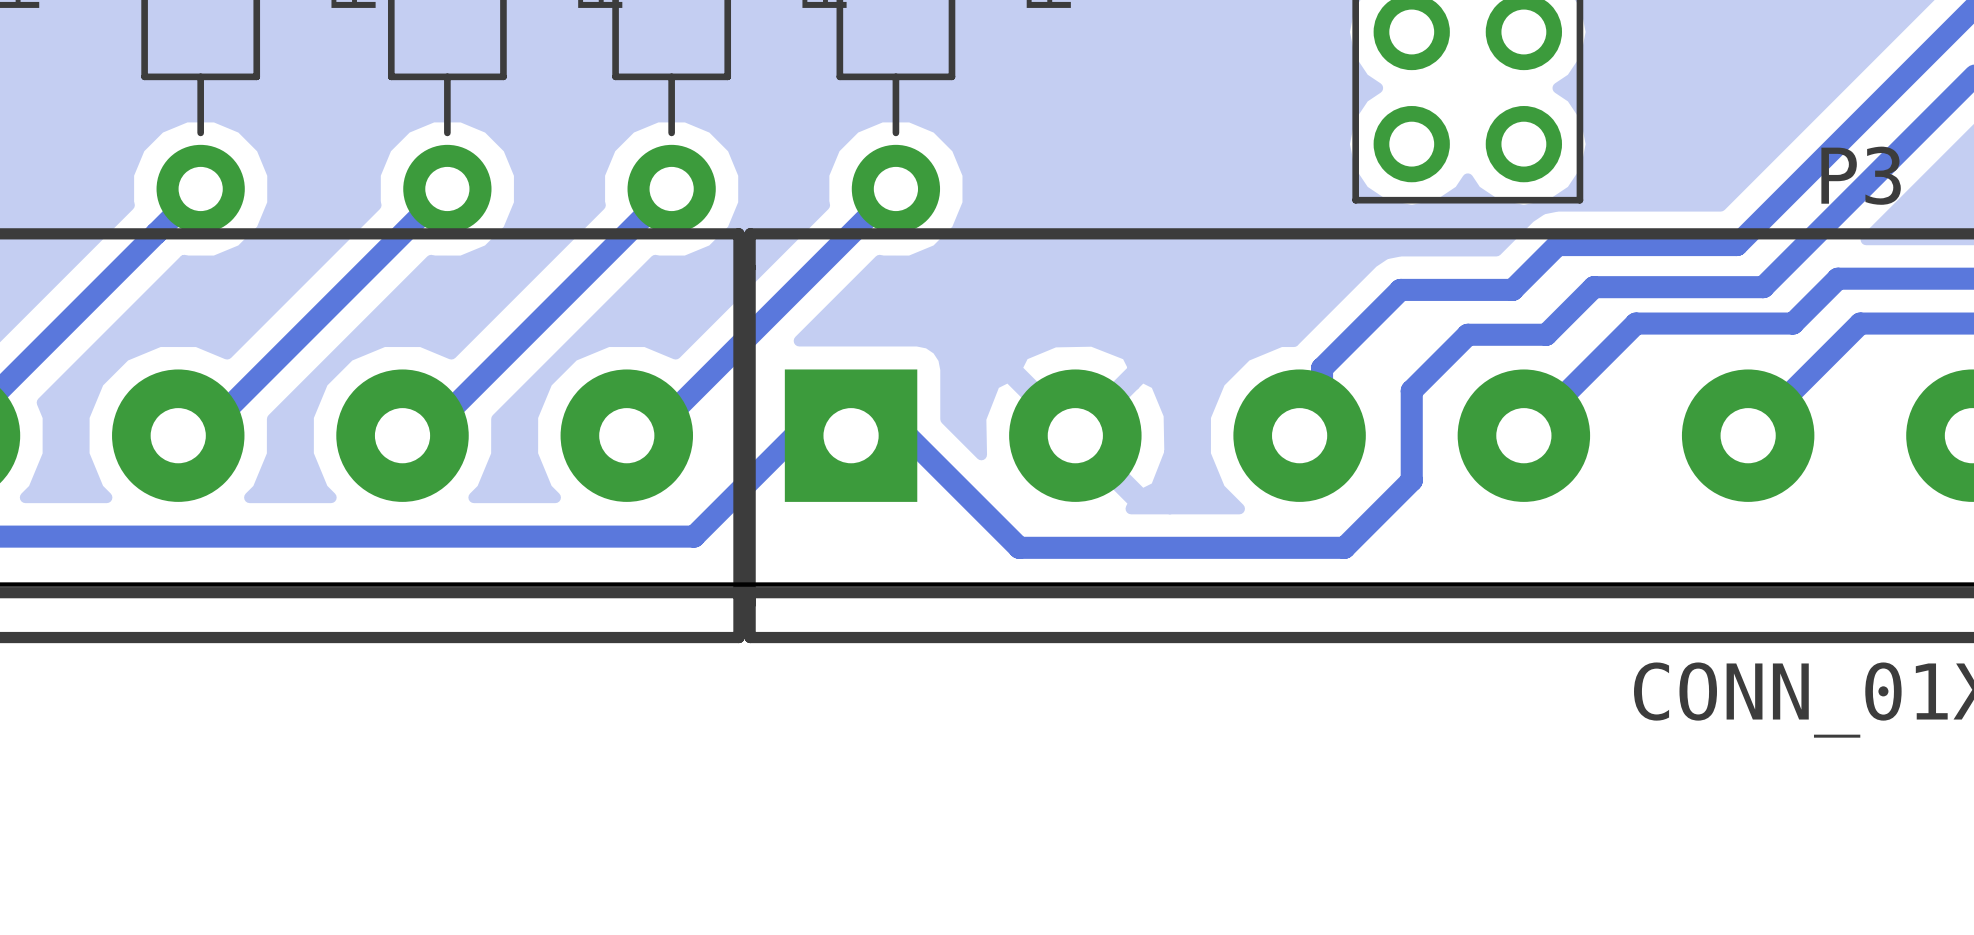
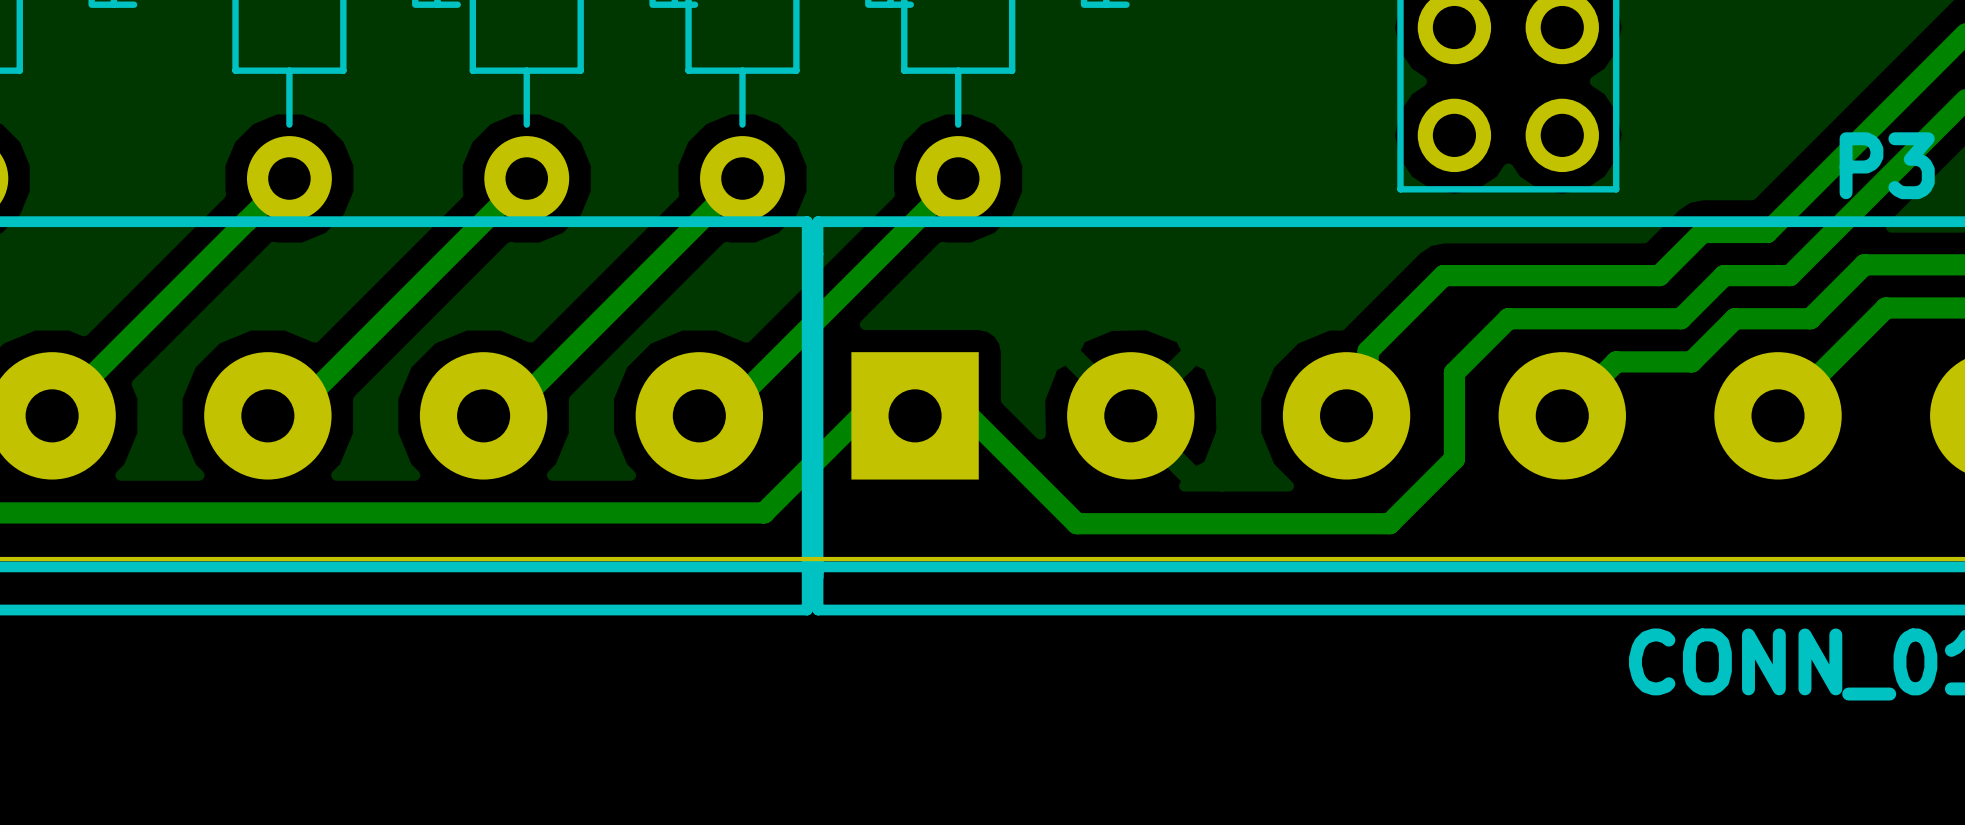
bottom track: (1669, 245) (1557, 245) (1512, 289) -> (1702, 232) (1659, 275) (1551, 275)
bottom track: (1763, 287) (1593, 287) (1546, 334) -> (1792, 272) (1790, 275) (1724, 275) (1680, 318) (1583, 318)
bottom track: (1793, 323) (1636, 323) (1579, 379) -> (1821, 307) (1810, 318) (1734, 318) (1691, 361) (1616, 361)

